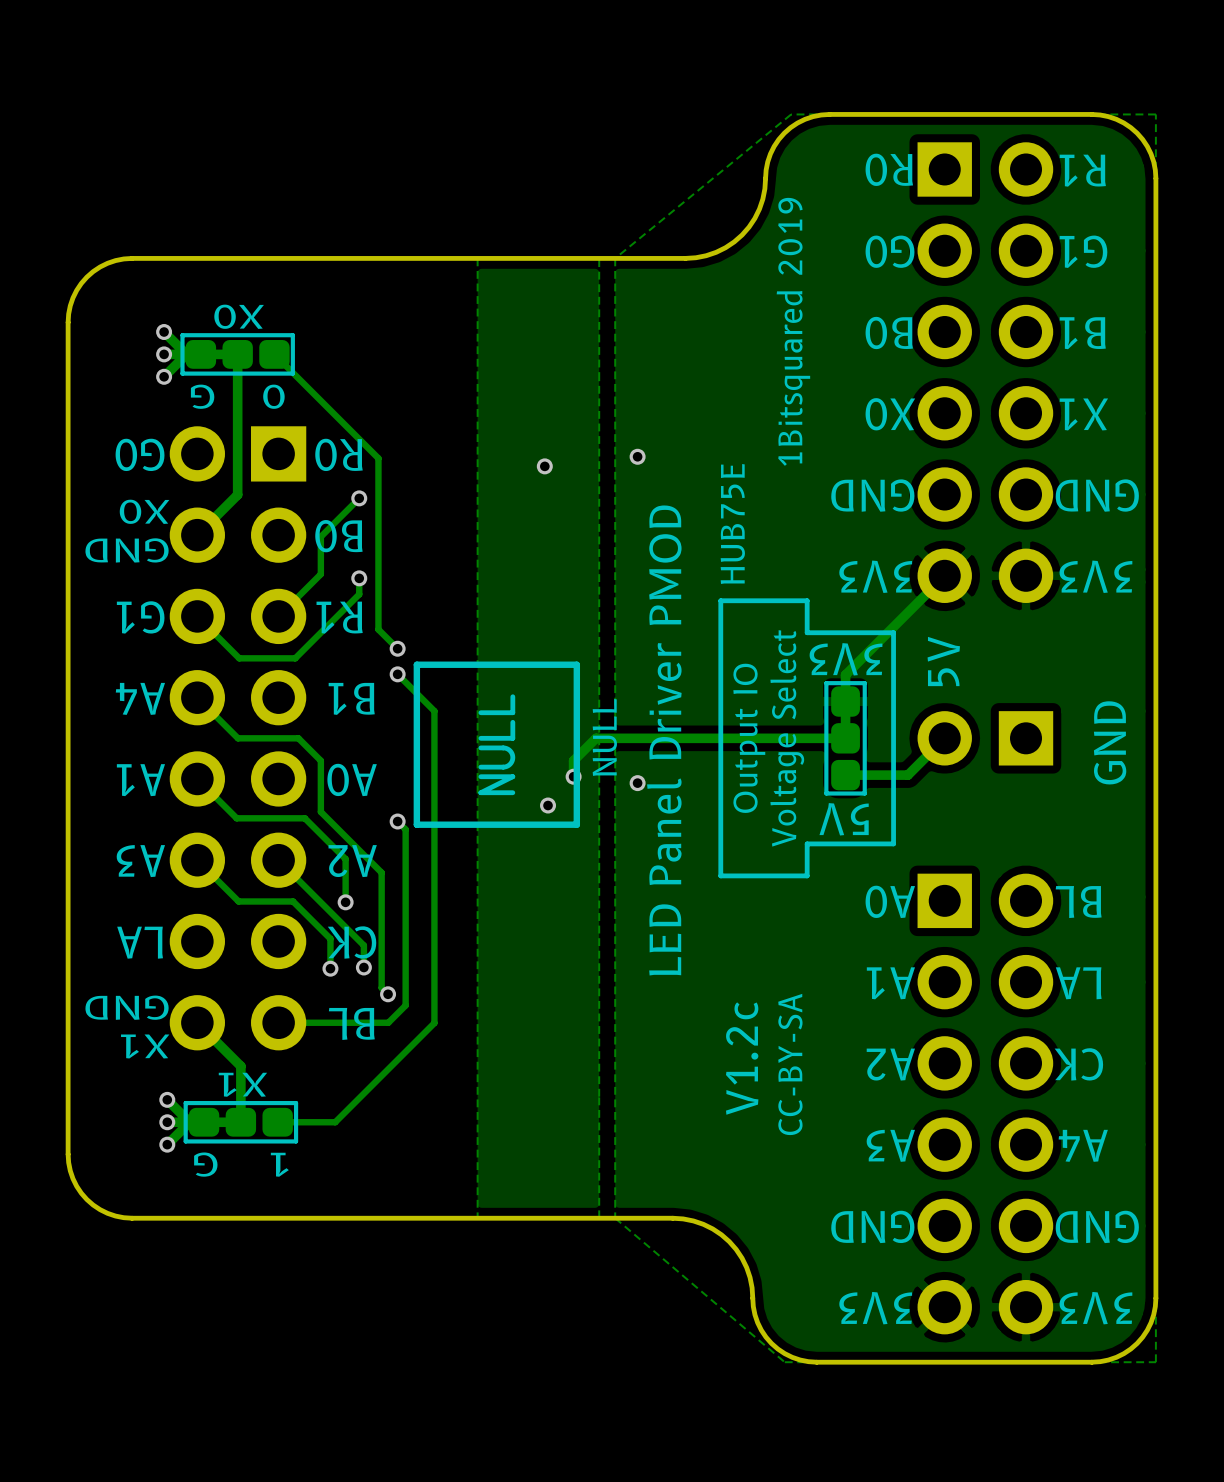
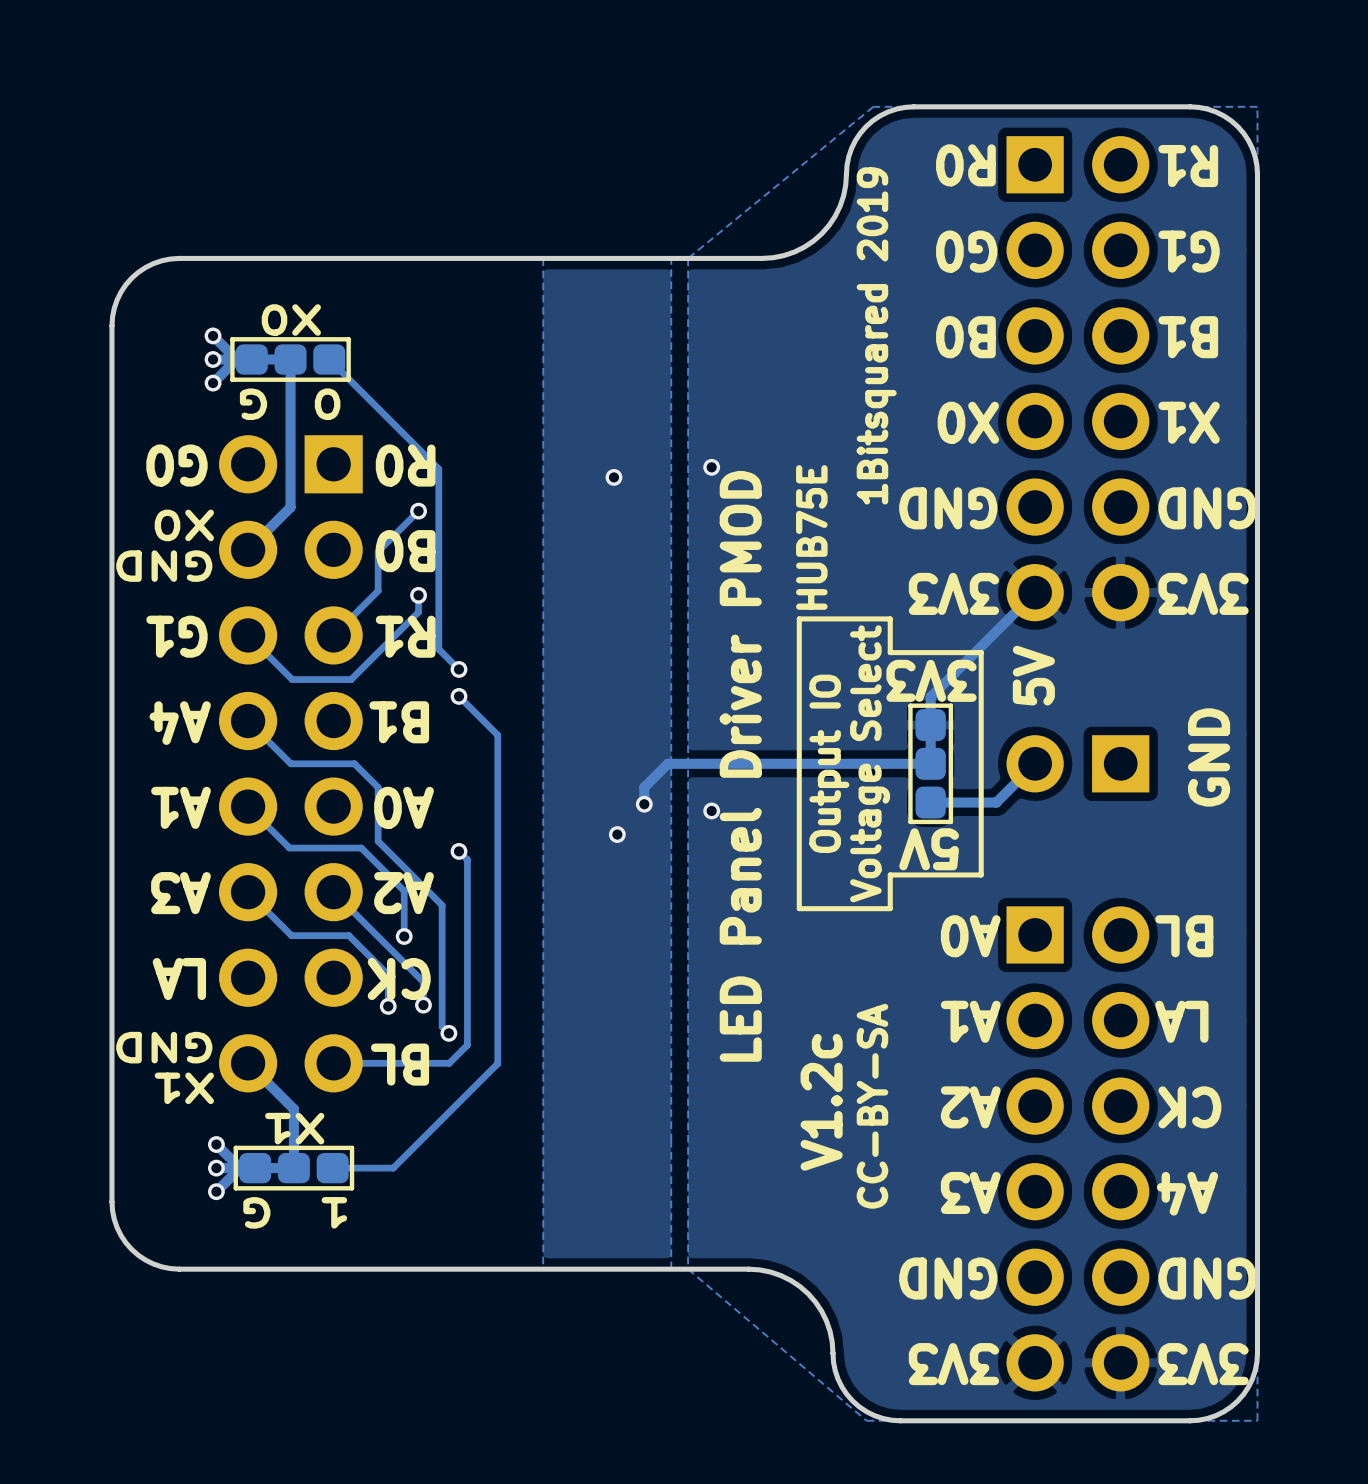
drawing: [413, 661, 581, 828] -> none
text: NULL (604, 737) -> none

